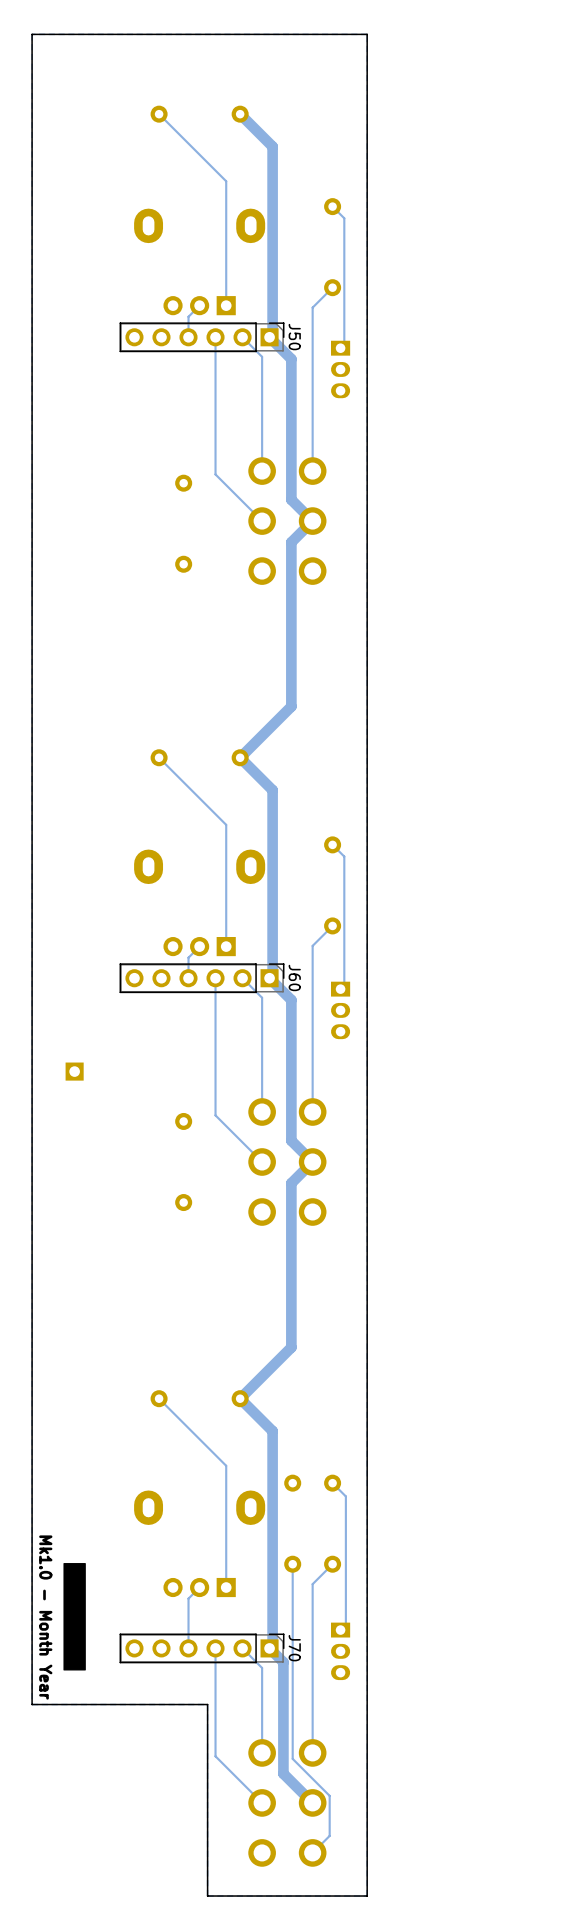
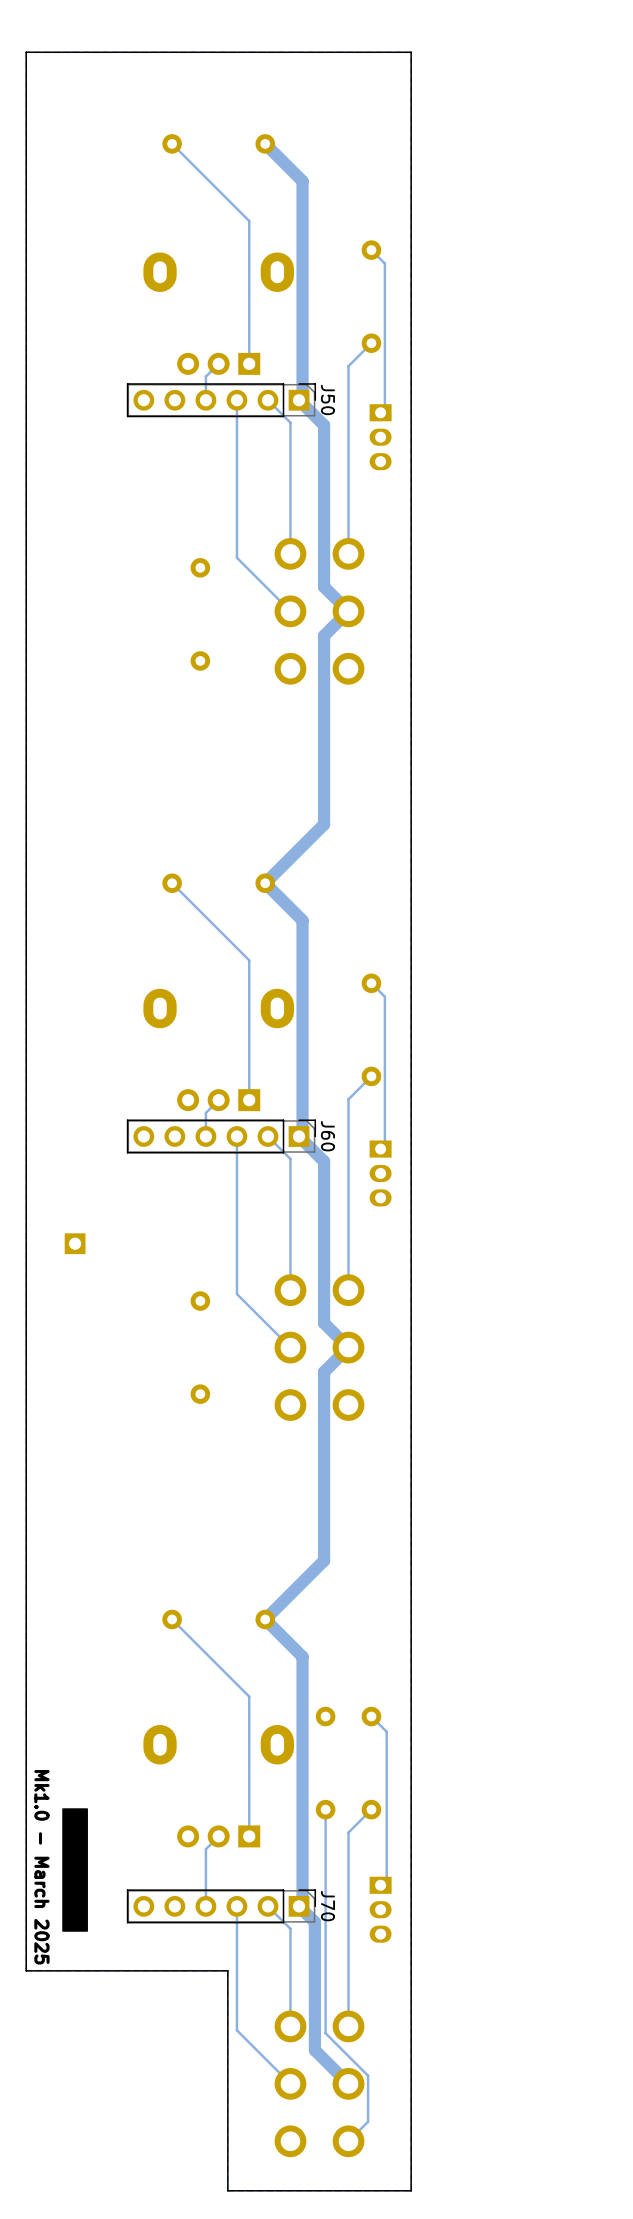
text: Mk1.0 - Month Year (45, 1617) -> Mk1.0 - March 2025 (41, 1867)

